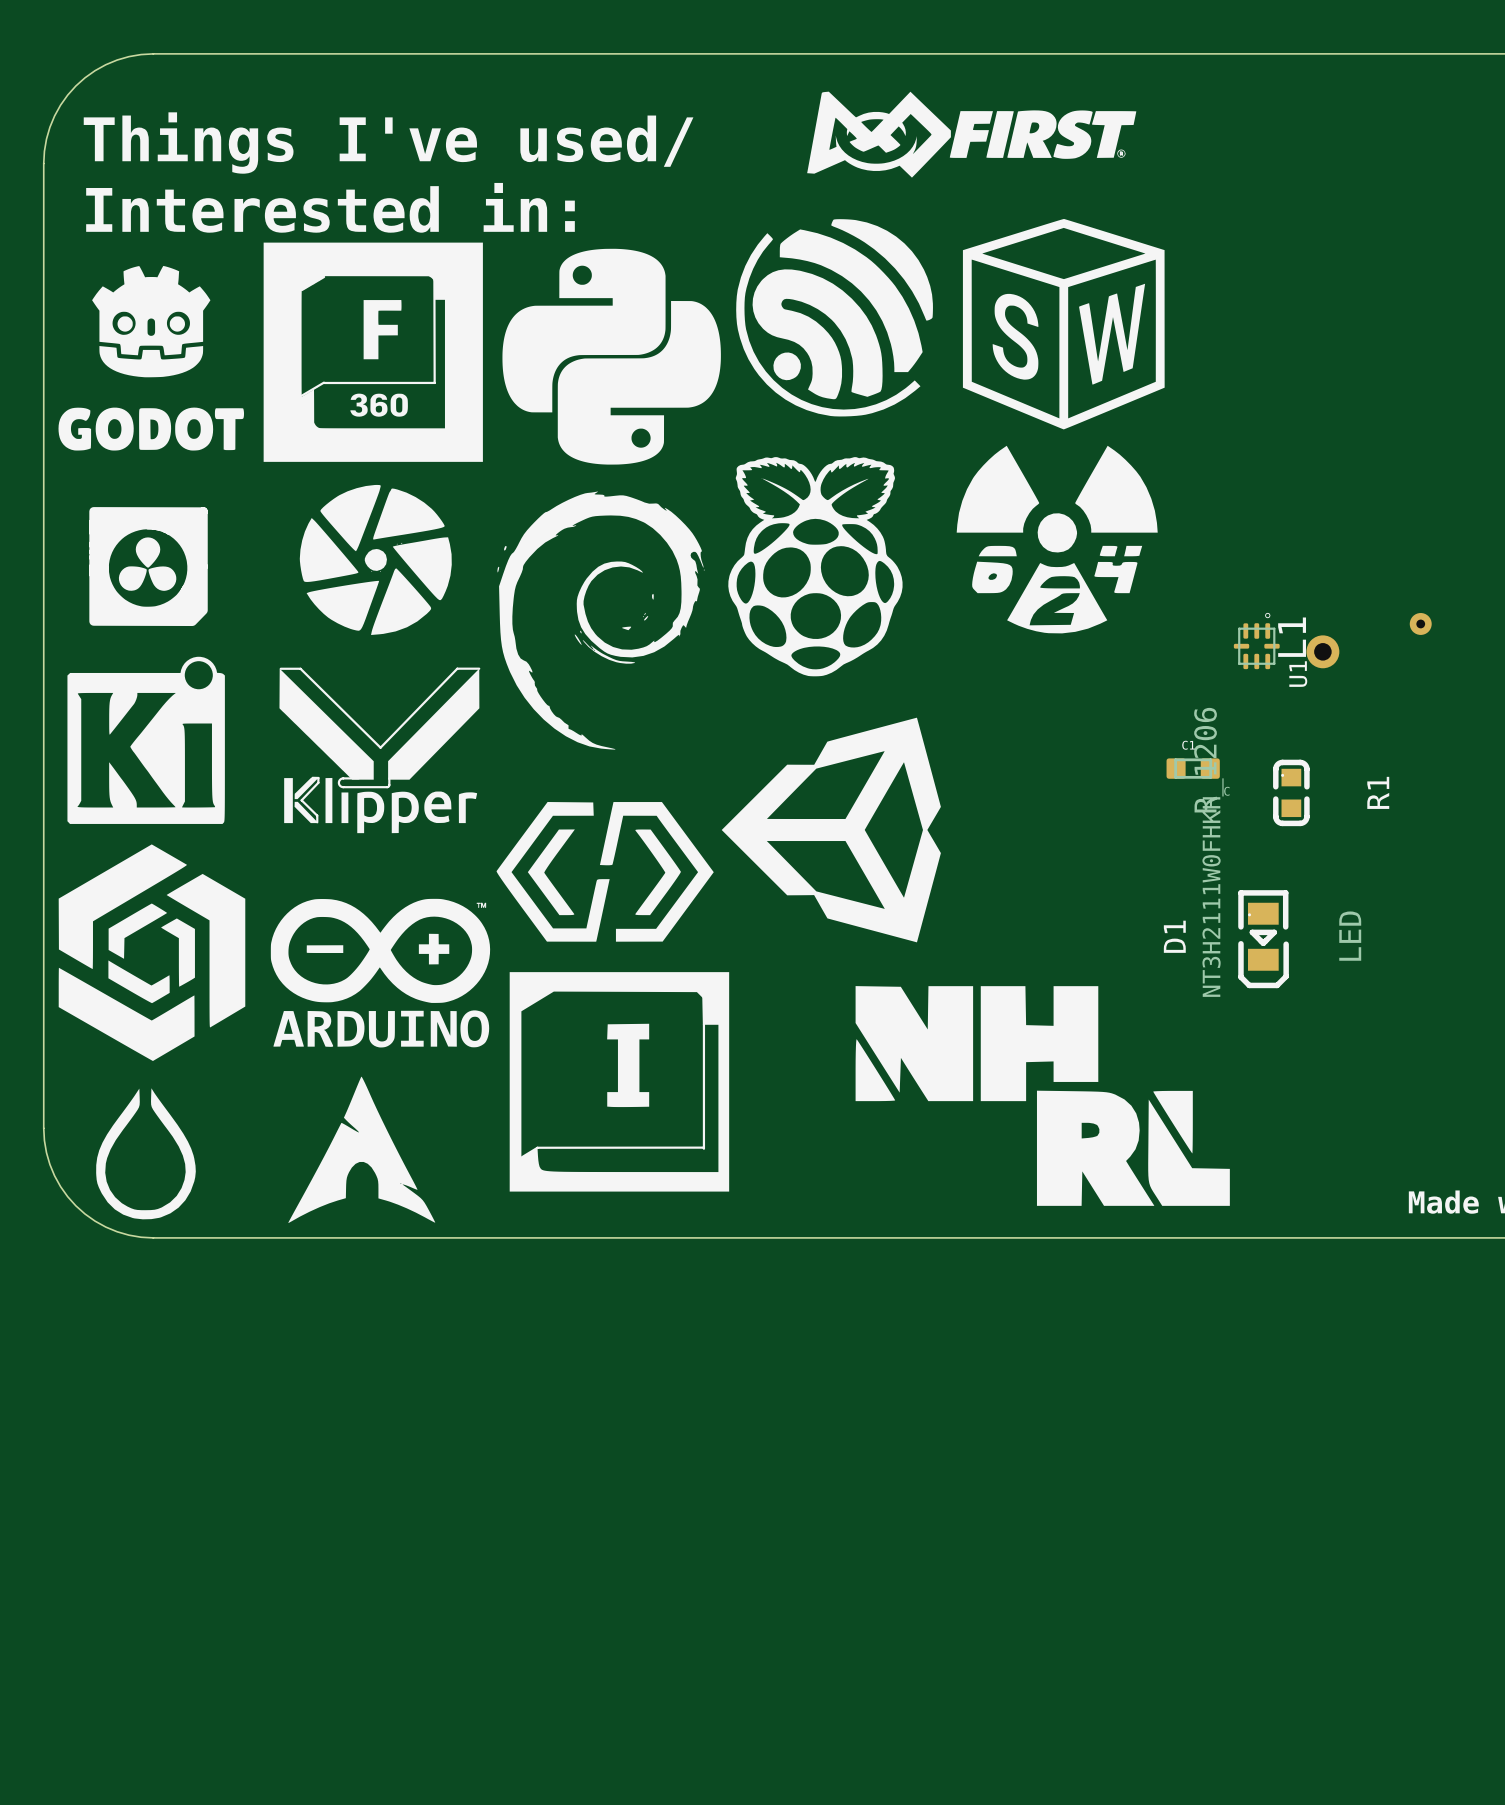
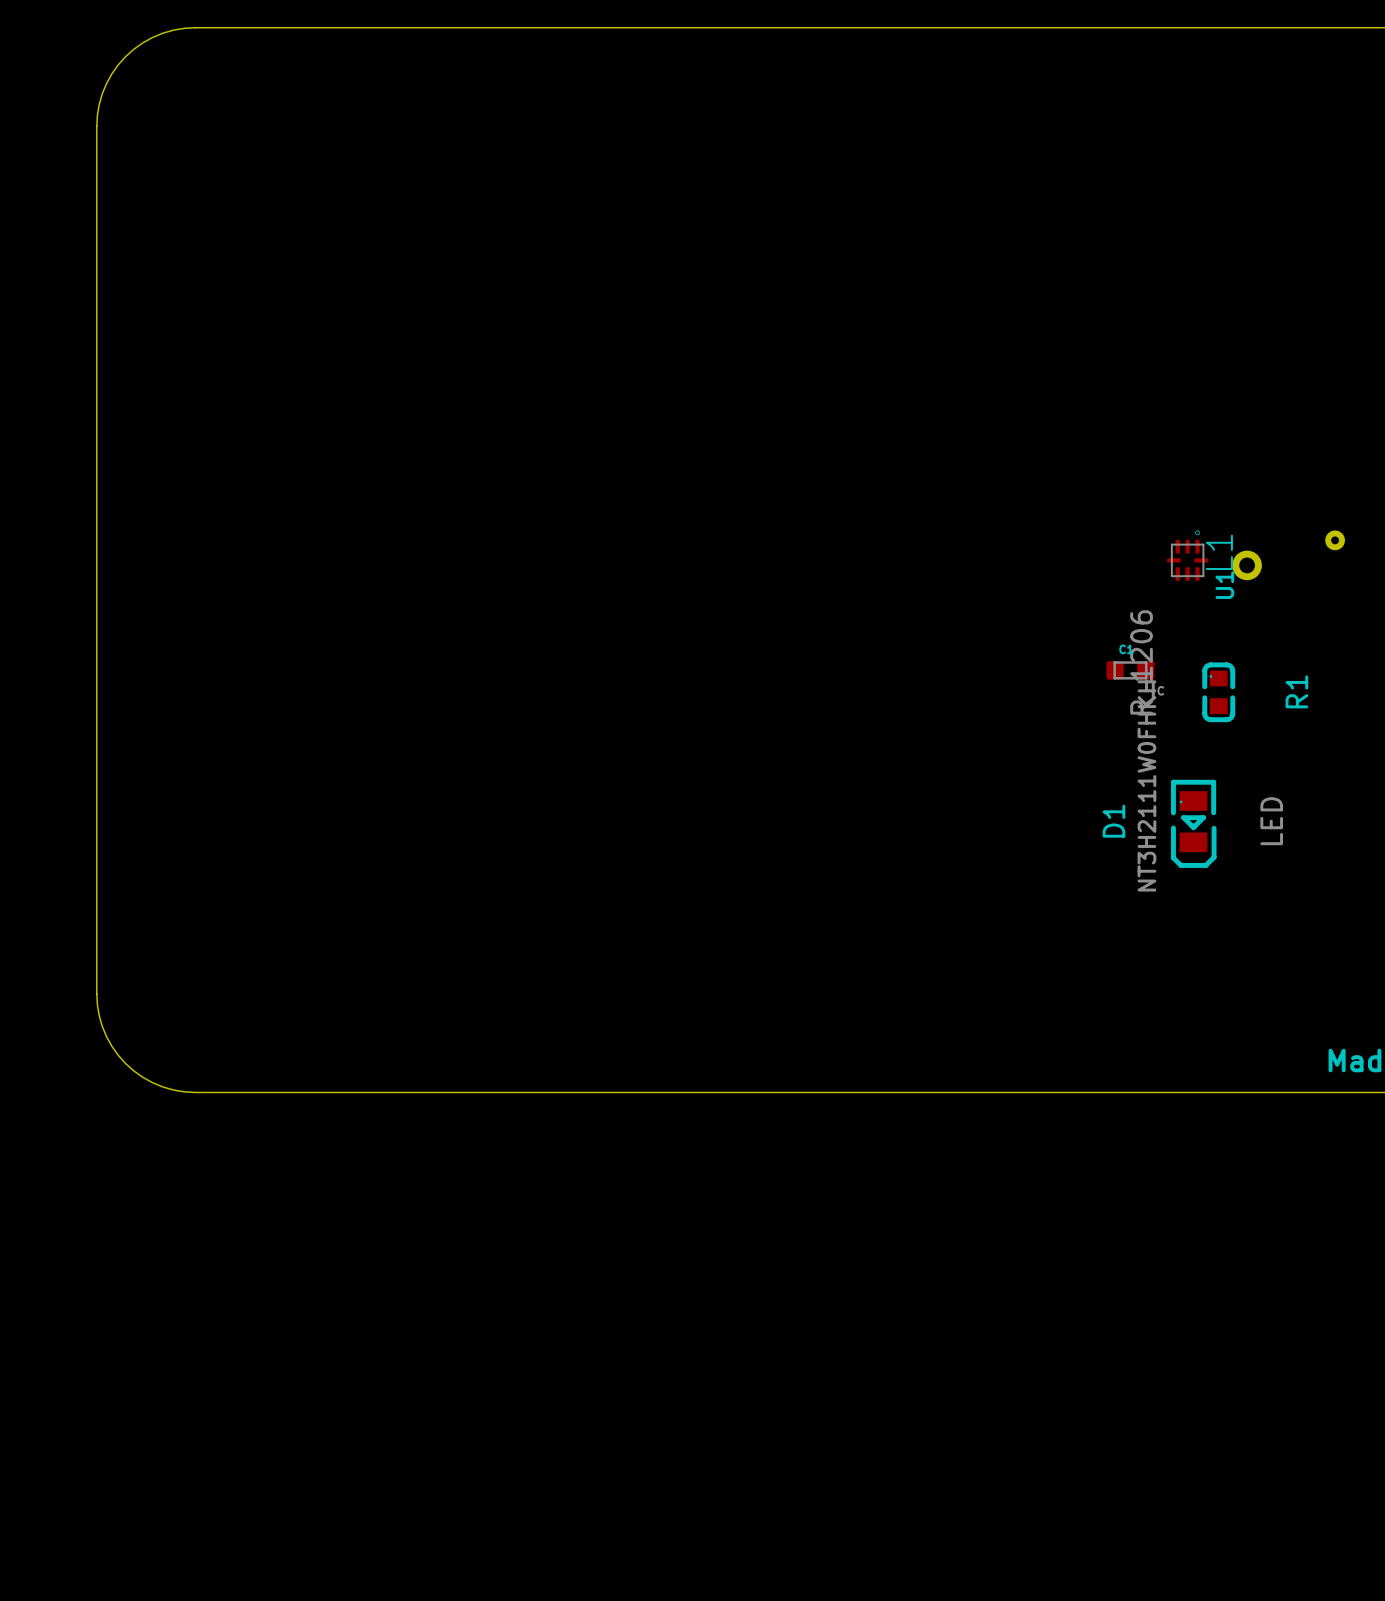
drawing: [807, 91, 1137, 178] -> none
text: Things I've used/ (388, 143) -> none
text: Interested in: (330, 207) -> none
drawing: [956, 218, 1165, 634] -> none
drawing: [58, 219, 941, 1192] -> none
drawing: [89, 507, 208, 627] -> none
drawing: [855, 986, 1230, 1206] -> none
drawing: [288, 1076, 436, 1223] -> none
drawing: [96, 1088, 196, 1220] -> none

